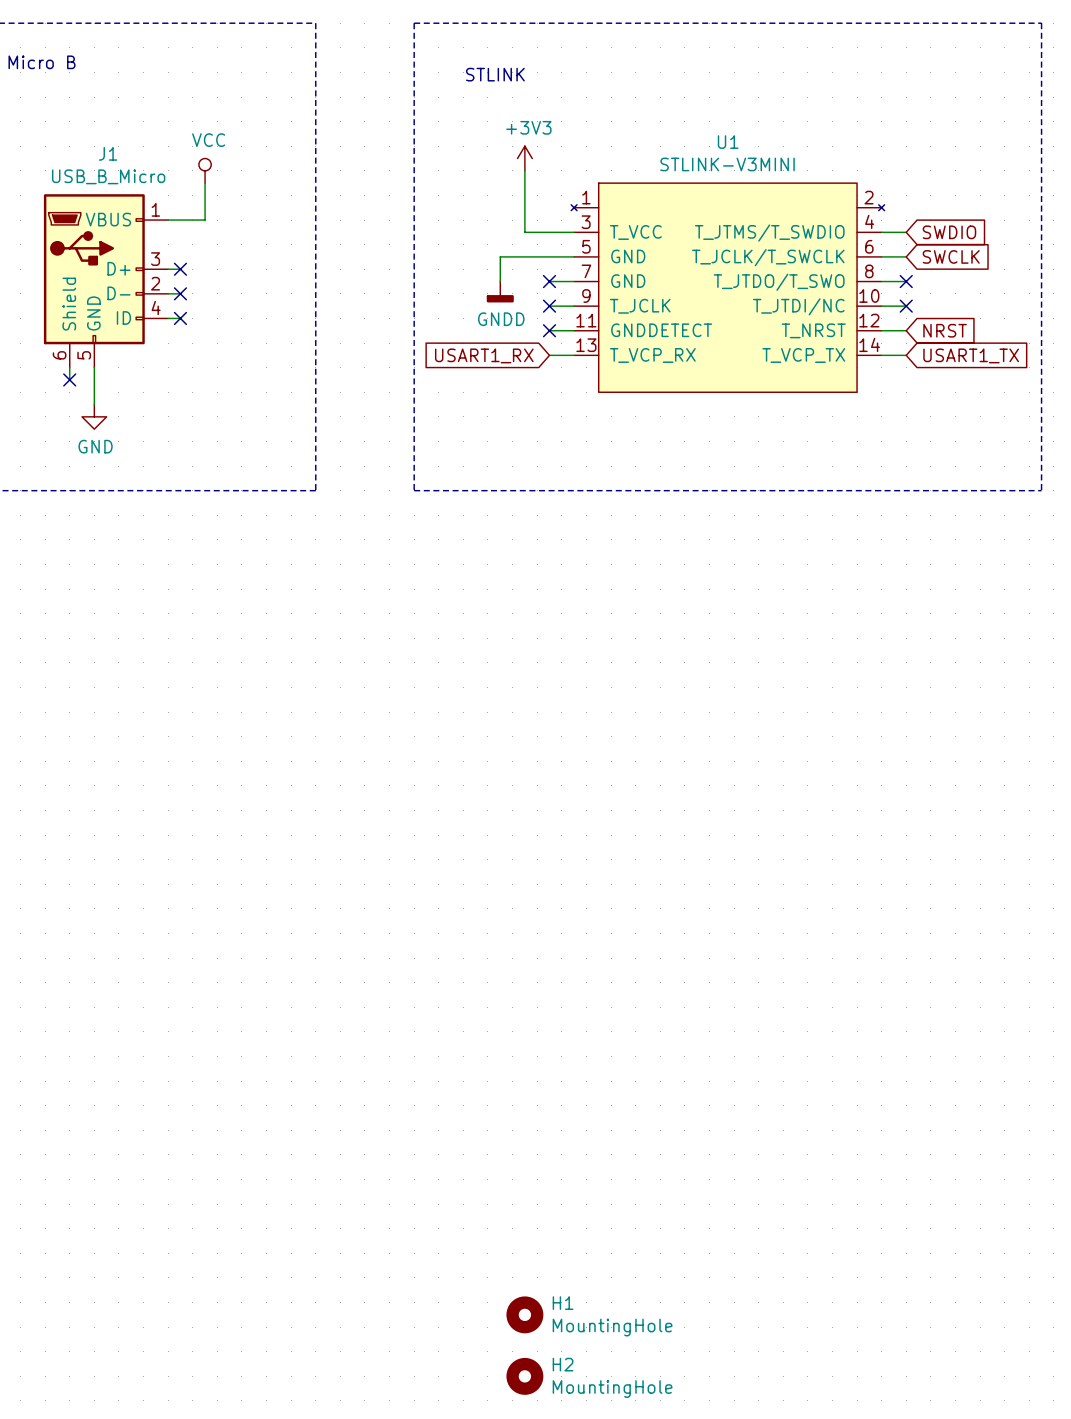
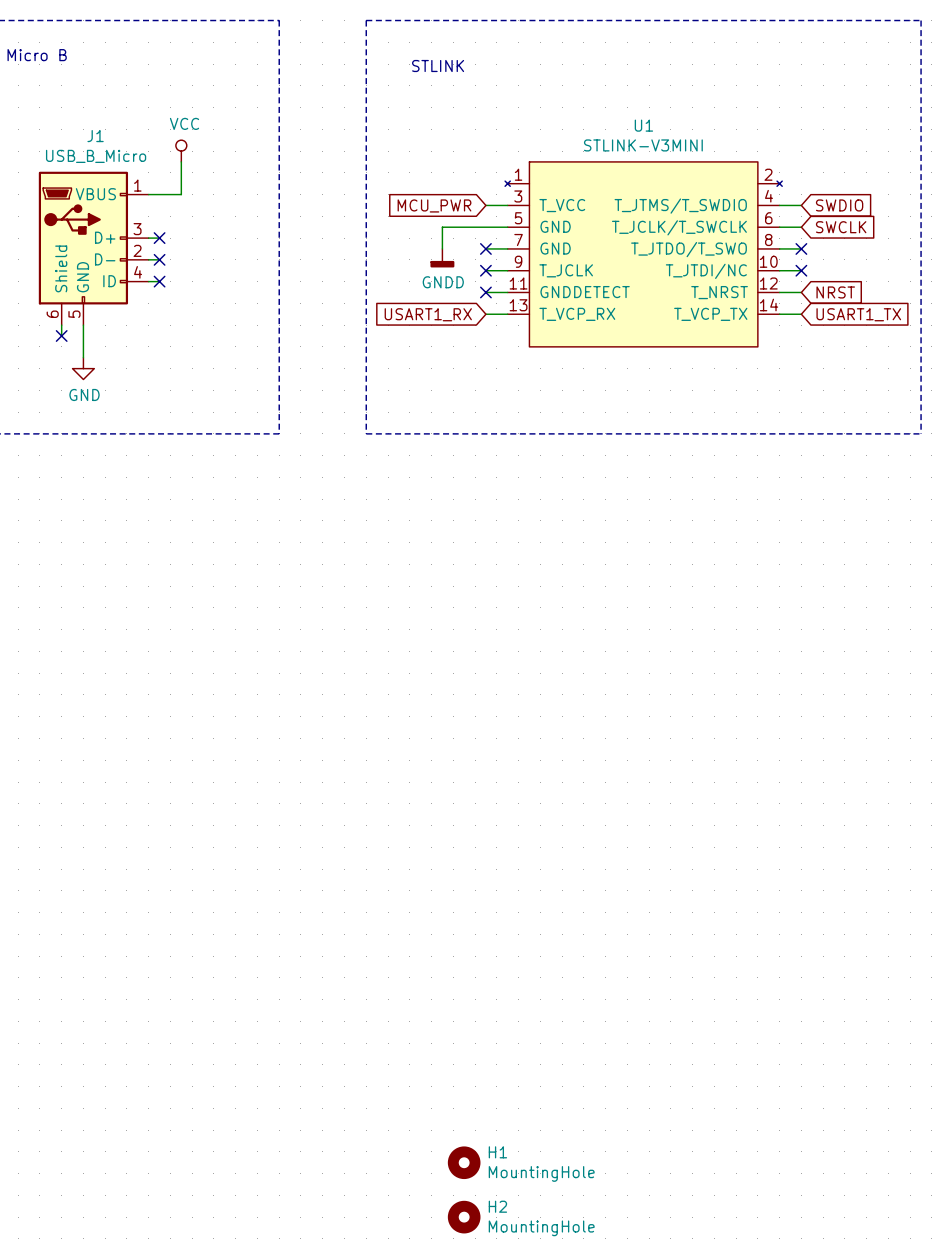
power symbol: +3V3 (524, 158) -> none
wire: (524, 170) (524, 232) (549, 232) -> none
global label: none -> MCU_PWR (434, 205)

